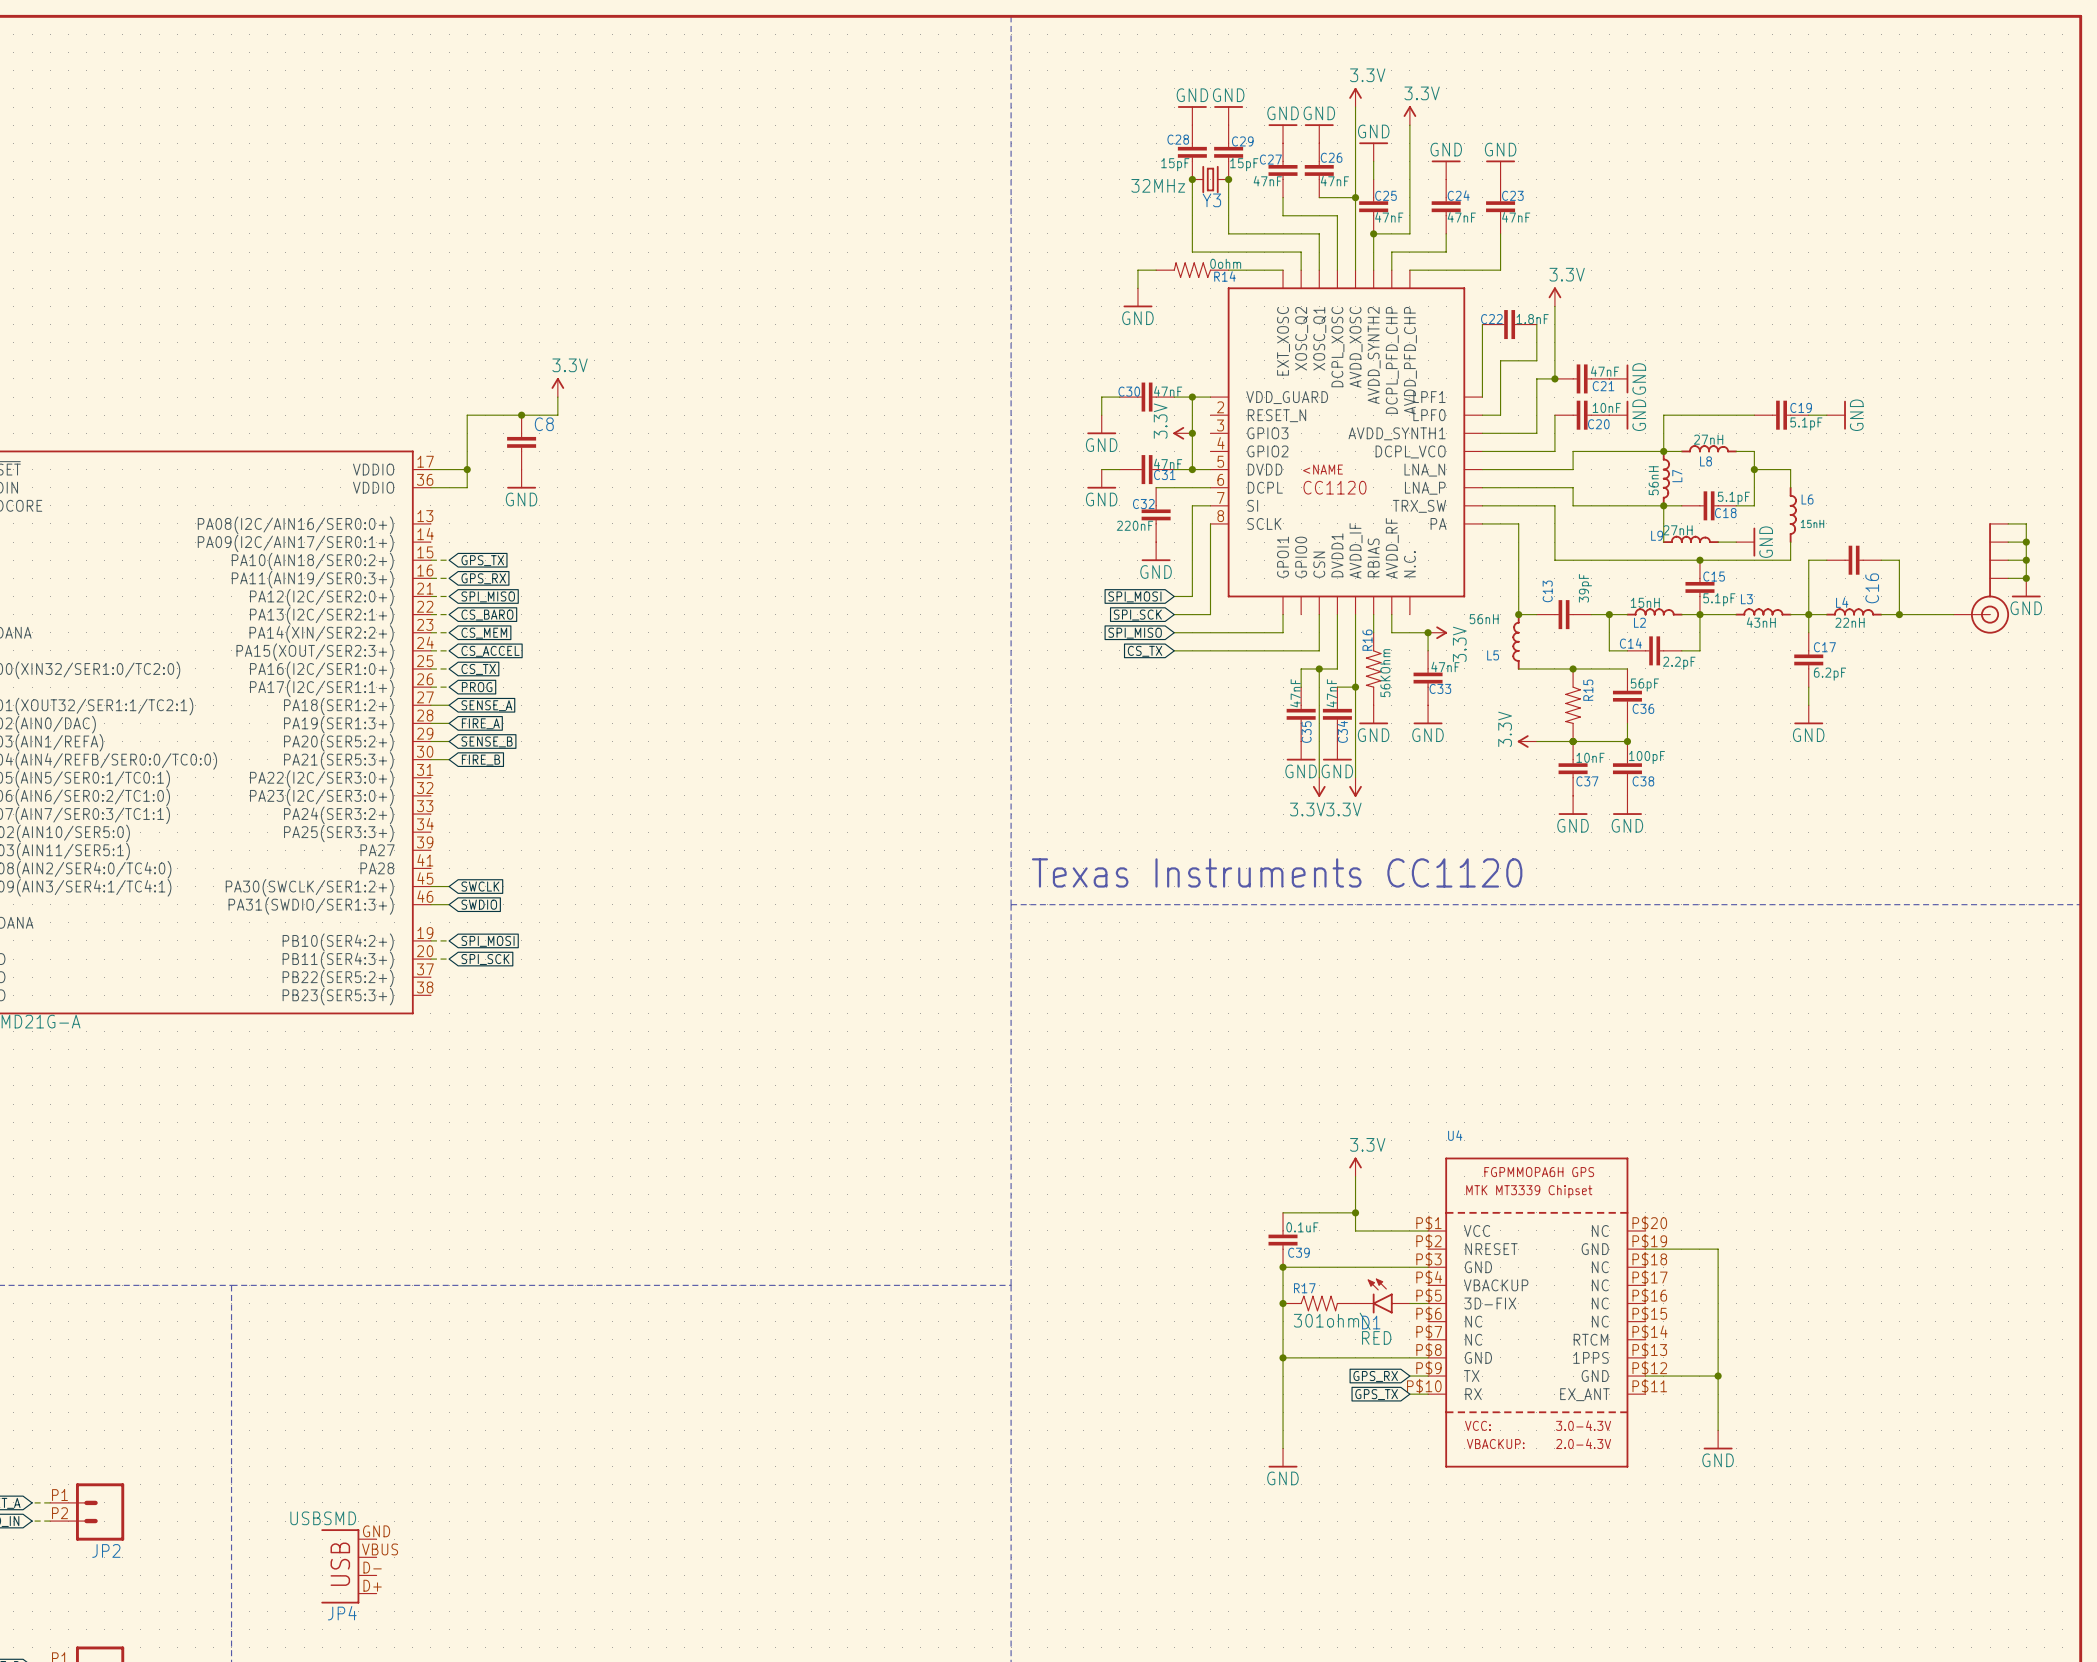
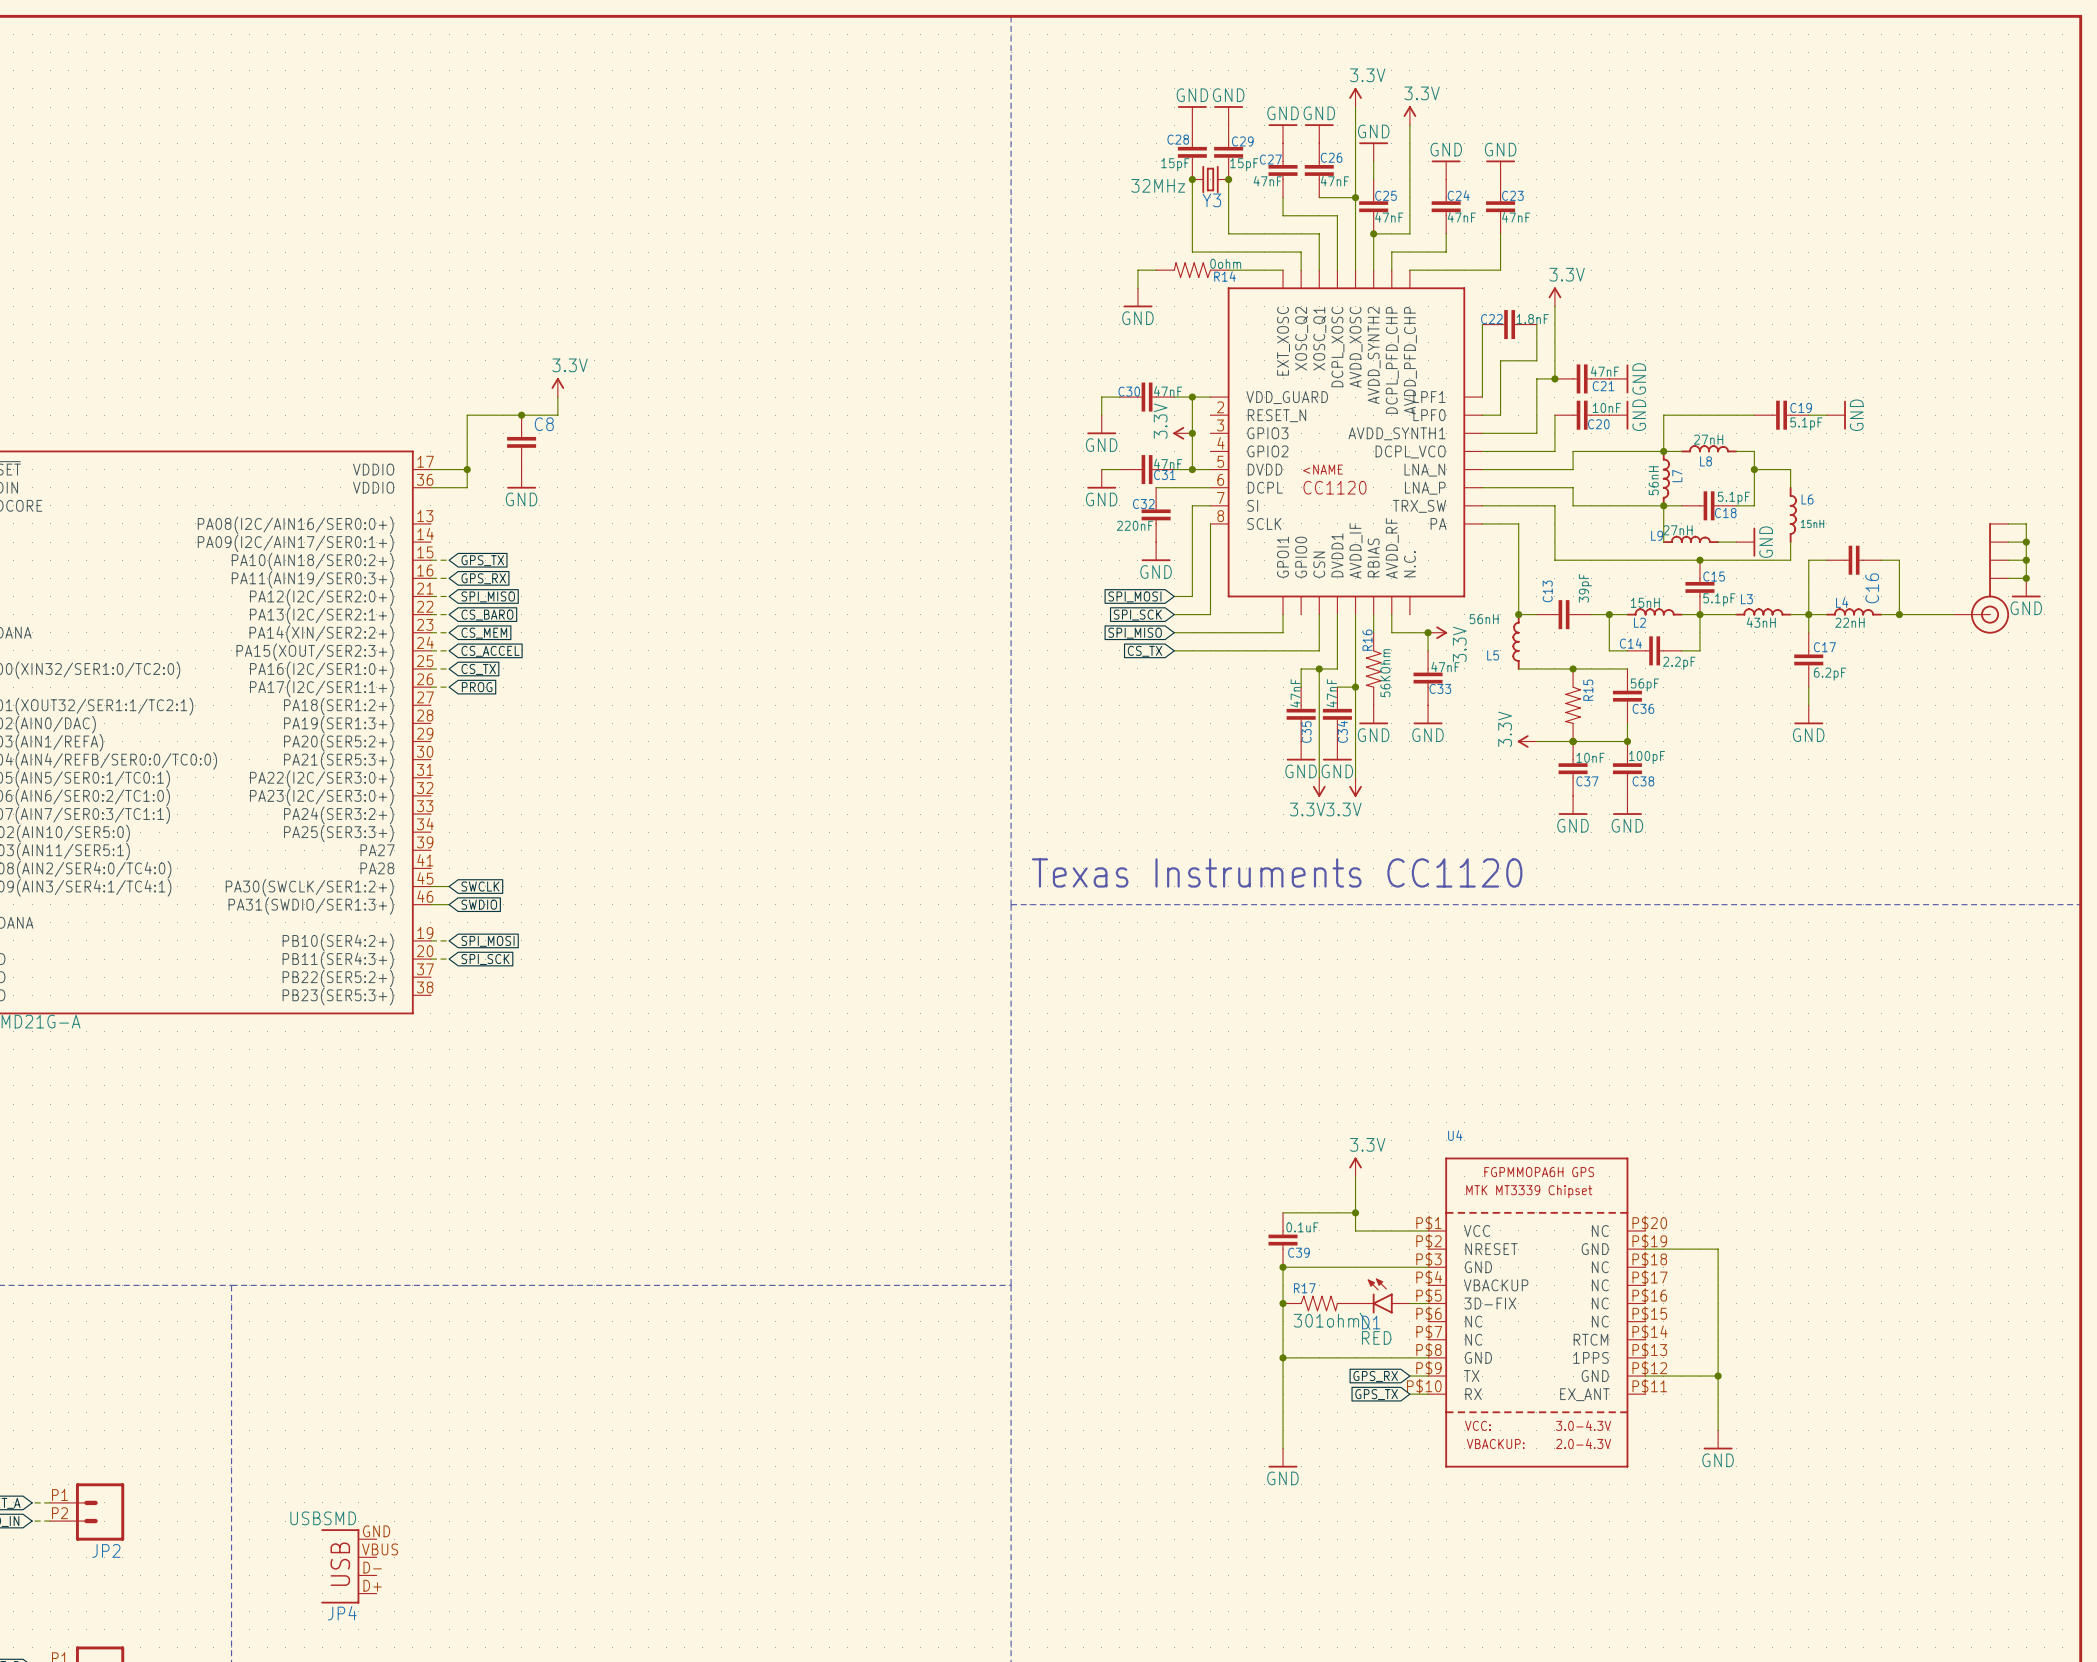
wire: (430, 705) (449, 705) -> none
global label: SENSE_A (486, 705) -> none
wire: (430, 723) (449, 723) -> none
global label: FIRE_A (480, 723) -> none
wire: (430, 741) (449, 741) -> none
global label: SENSE_B (487, 741) -> none
wire: (430, 759) (449, 759) -> none
global label: FIRE_B (481, 760) -> none

